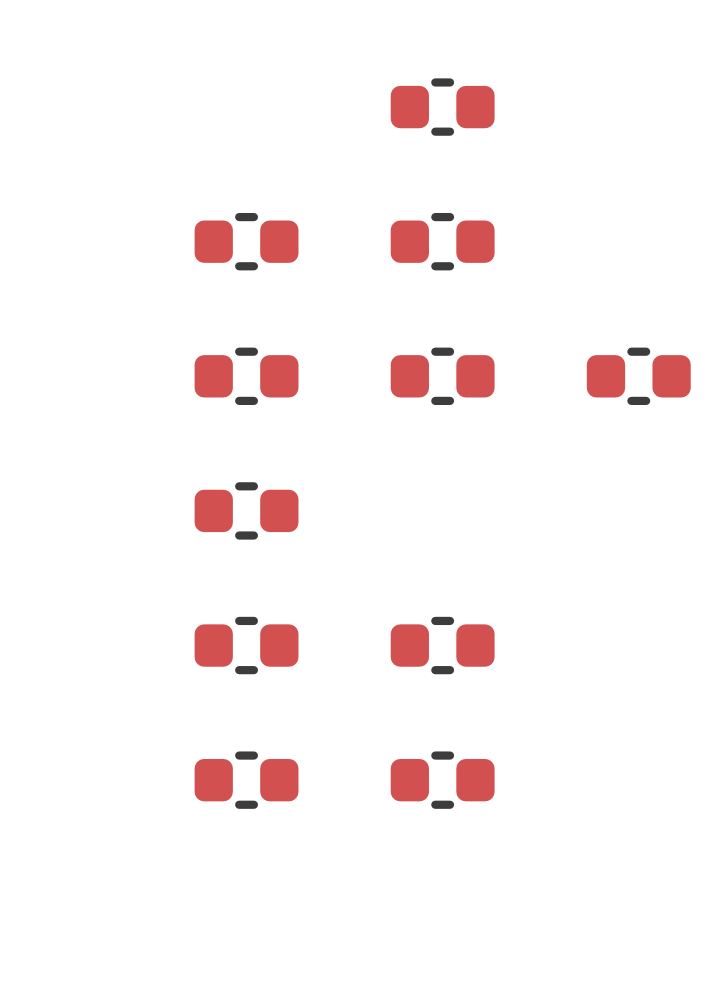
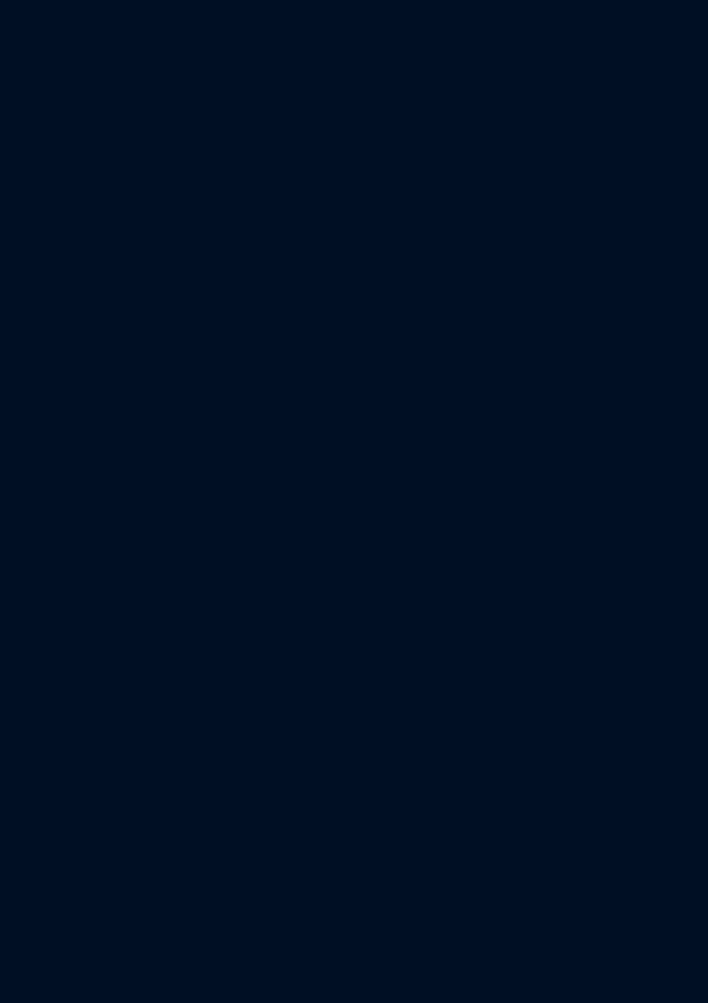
part: (442, 107) -> none
part: (246, 241) -> none
part: (442, 241) -> none
part: (246, 376) -> none
part: (442, 376) -> none
part: (638, 376) -> none
part: (246, 510) -> none
part: (246, 645) -> none
part: (442, 645) -> none
part: (246, 780) -> none
part: (442, 780) -> none

